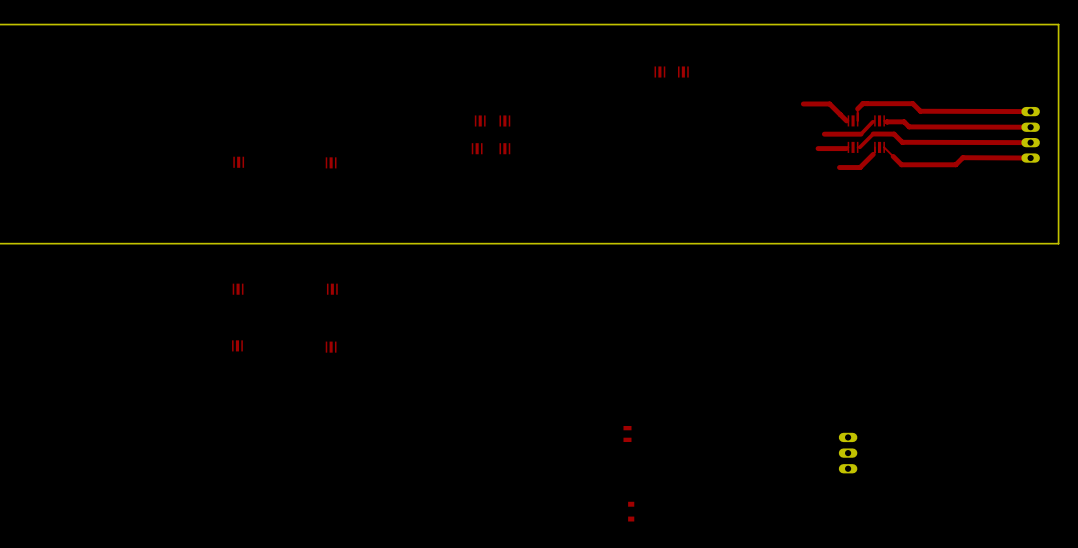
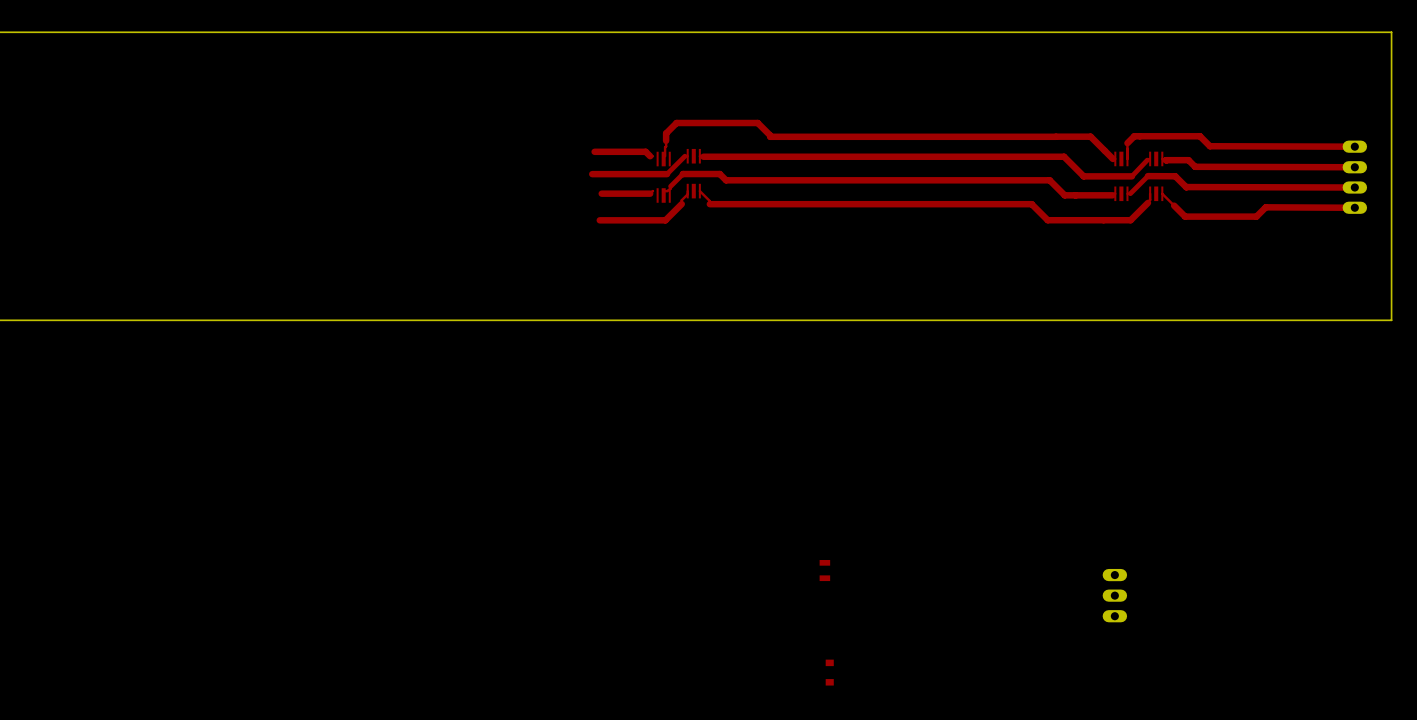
part: (659, 72) -> none
part: (683, 72) -> none
top track: none -> (1056, 136) (770, 136) (757, 123) (676, 123) (666, 133) (666, 140)
top track: none -> (666, 140) (665, 156)
top track: none -> (594, 151) (645, 151) (652, 156)
top track: none -> (687, 156) (684, 156) (667, 174) (592, 174)
part: none -> (693, 156)
top track: none -> (699, 156) (1064, 156) (1083, 176)
part: (480, 120) -> none
top track: none -> (682, 174) (719, 174) (726, 180) (1049, 180) (1064, 195) (1075, 195)
top track: none -> (682, 174) (670, 188) (665, 191)
top track: none -> (652, 191) (650, 193) (601, 193)
top track: none -> (687, 191) (687, 194) (681, 200) (681, 204) (665, 220) (599, 220)
part: none -> (693, 191)
top track: none -> (699, 191) (709, 201) (709, 204) (1031, 204) (1047, 220) (1103, 220)
part: (477, 148) -> none
part: (238, 162) -> none
part: (331, 162) -> none
part: (238, 289) -> none
part: (332, 289) -> none
part: (237, 345) -> none
part: (331, 347) -> none

